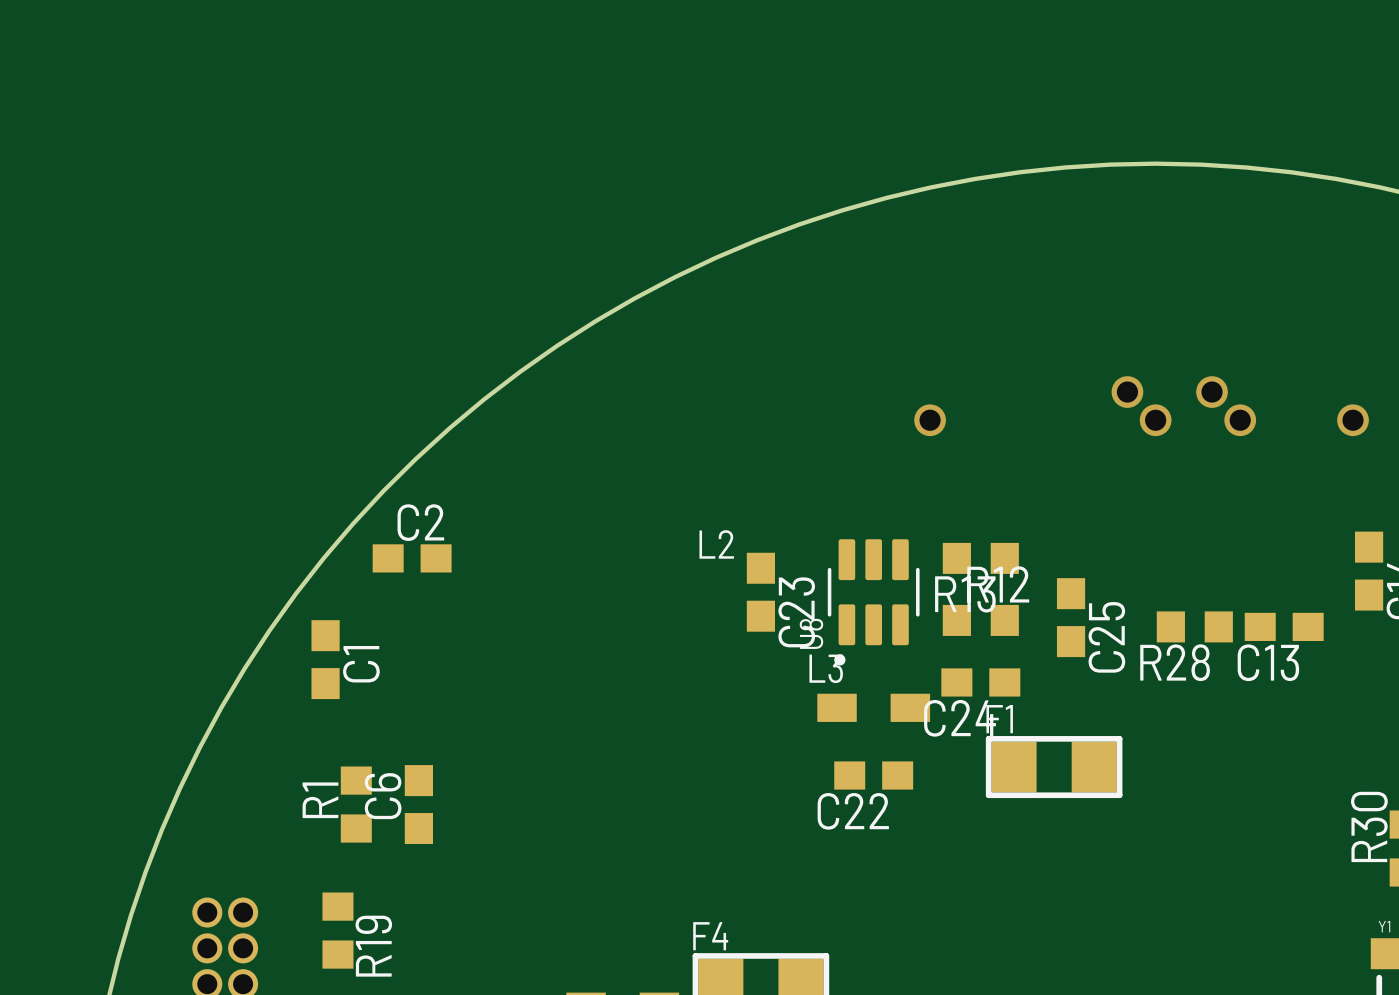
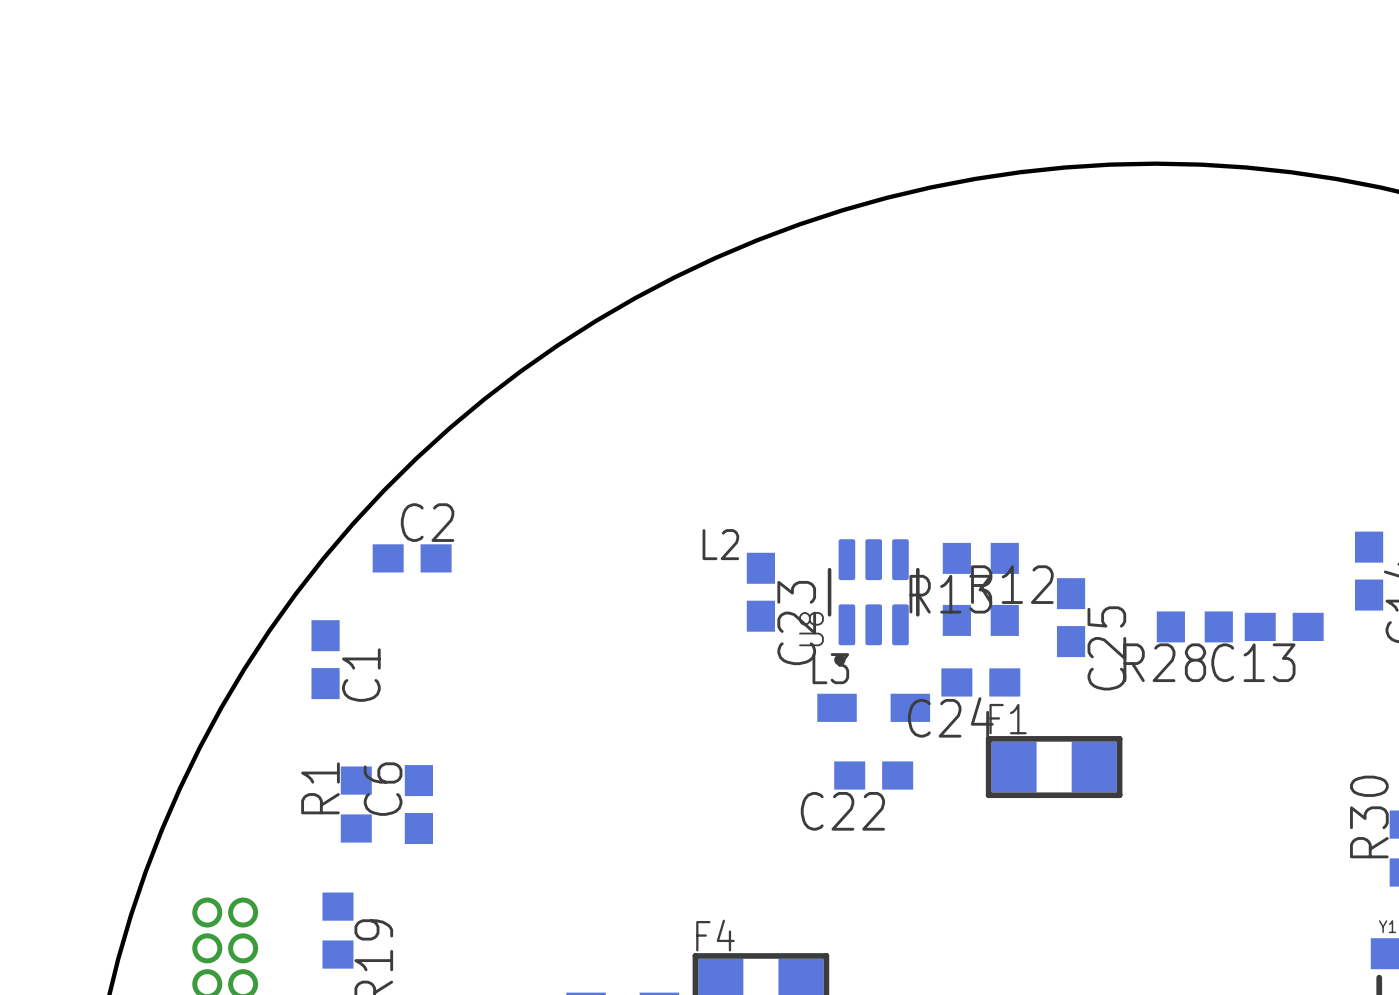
via: (1127, 392) -> none
via: (1212, 392) -> none
via: (930, 420) -> none
via: (1155, 420) -> none
via: (1240, 420) -> none
via: (1353, 420) -> none

